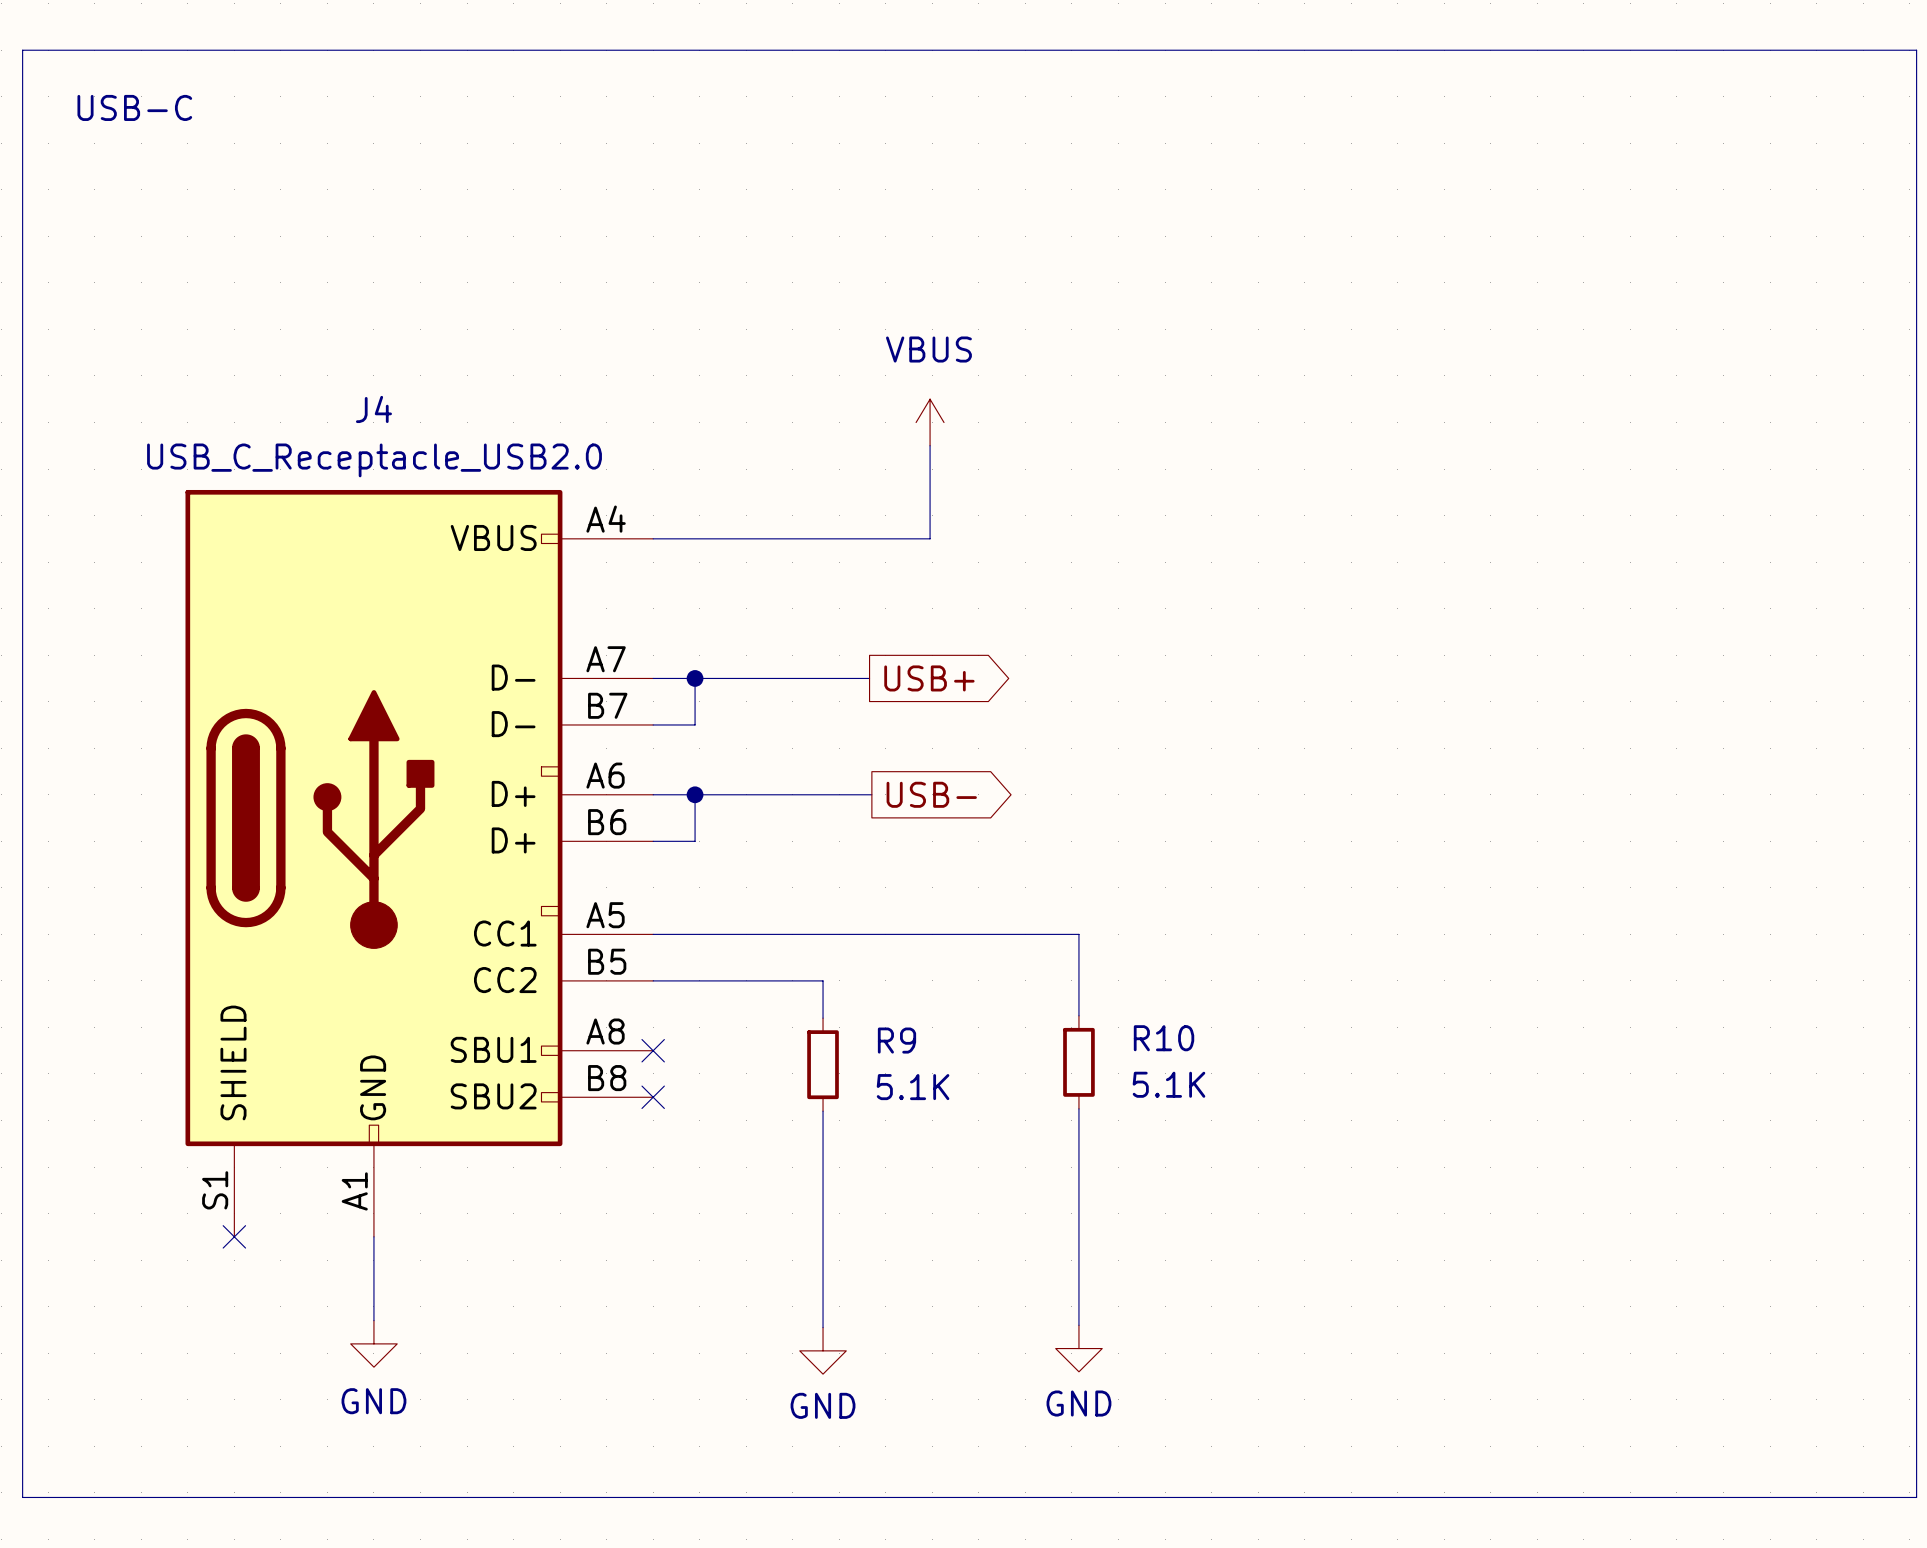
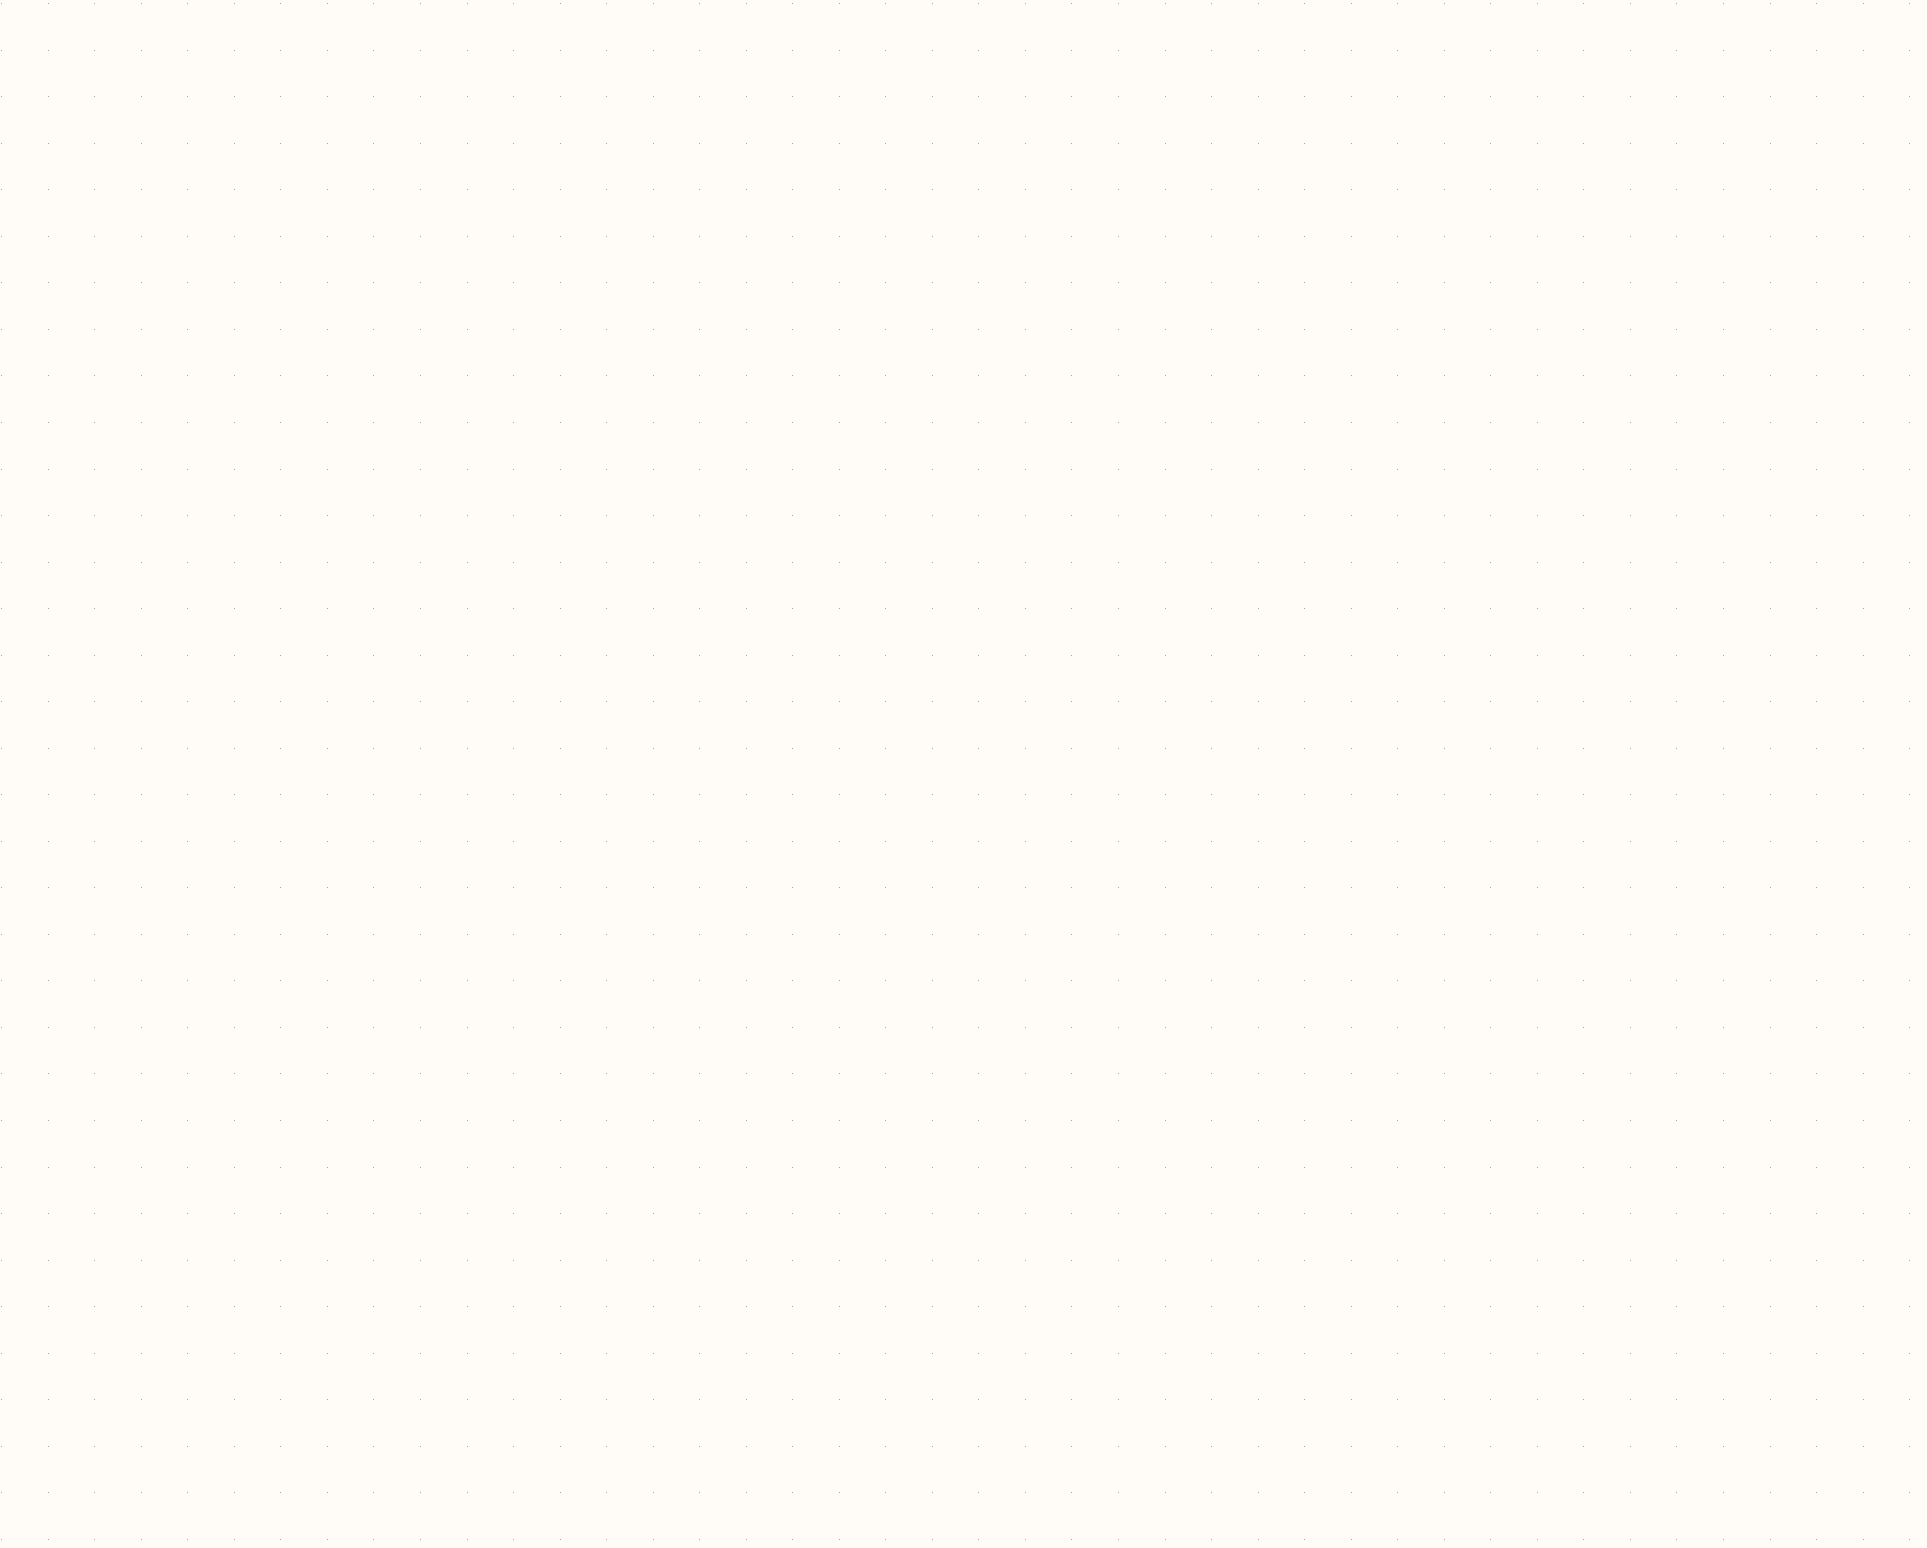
line: (22, 50) (1916, 50) (1916, 1497) (22, 1497) (22, 50) -> none
text: USB-C (134, 107) -> none
power symbol: VBUS (930, 422) -> none
wire: (930, 445) (930, 538) (653, 538) -> none
wire: (653, 678) (869, 678) -> none
wire: (695, 678) (695, 724) (653, 724) -> none
junction: (695, 678) -> none
global label: USB+ (929, 678) -> none
wire: (653, 794) (871, 794) -> none
wire: (695, 794) (695, 841) (653, 841) -> none
junction: (695, 794) -> none
global label: USB- (931, 794) -> none
J4: USB_C_Receptacle_USB2.0 (419, 863) -> none
wire: (653, 934) (1078, 934) (1078, 1015) -> none
wire: (653, 980) (823, 980) (823, 1018) -> none
no-connect mark: (653, 1050) -> none
R10: 5.1K (1078, 1062) -> none
R9: 5.1K (823, 1064) -> none
no-connect mark: (653, 1097) -> none
wire: (1078, 1108) (1078, 1325) -> none
wire: (823, 1111) (823, 1327) -> none
no-connect mark: (234, 1236) -> none
wire: (373, 1236) (373, 1320) -> none
power symbol: GND (373, 1343) -> none
power symbol: GND (1078, 1348) -> none
power symbol: GND (823, 1350) -> none

